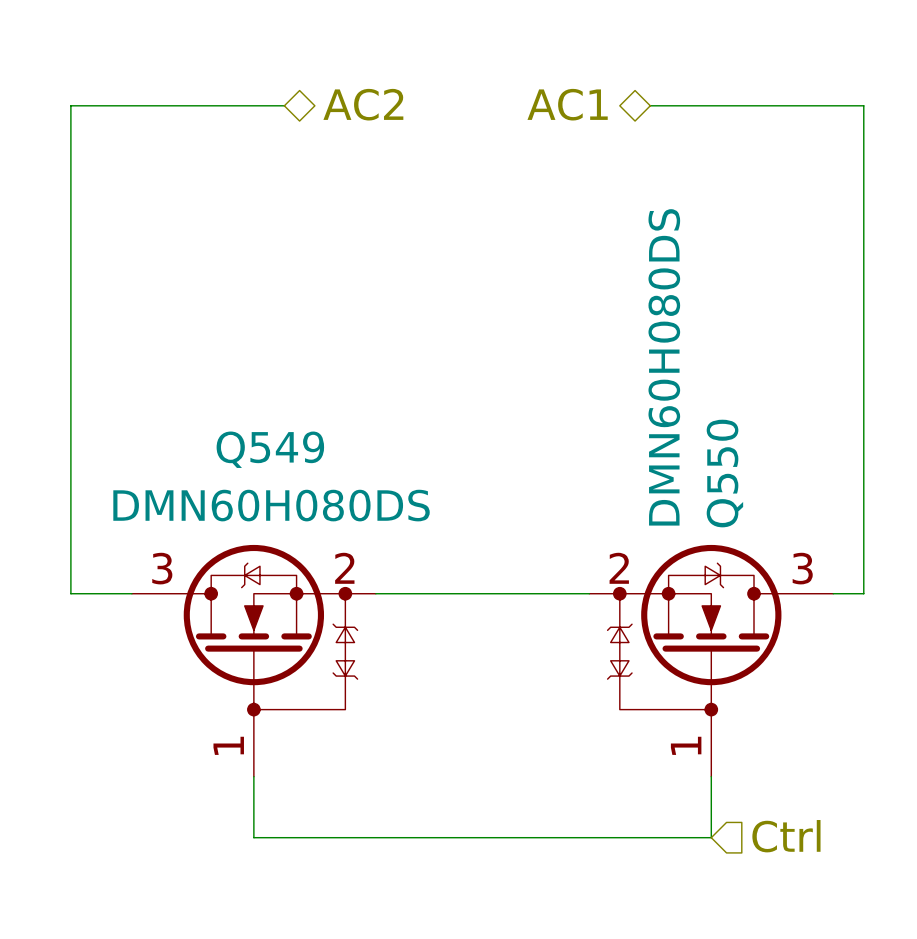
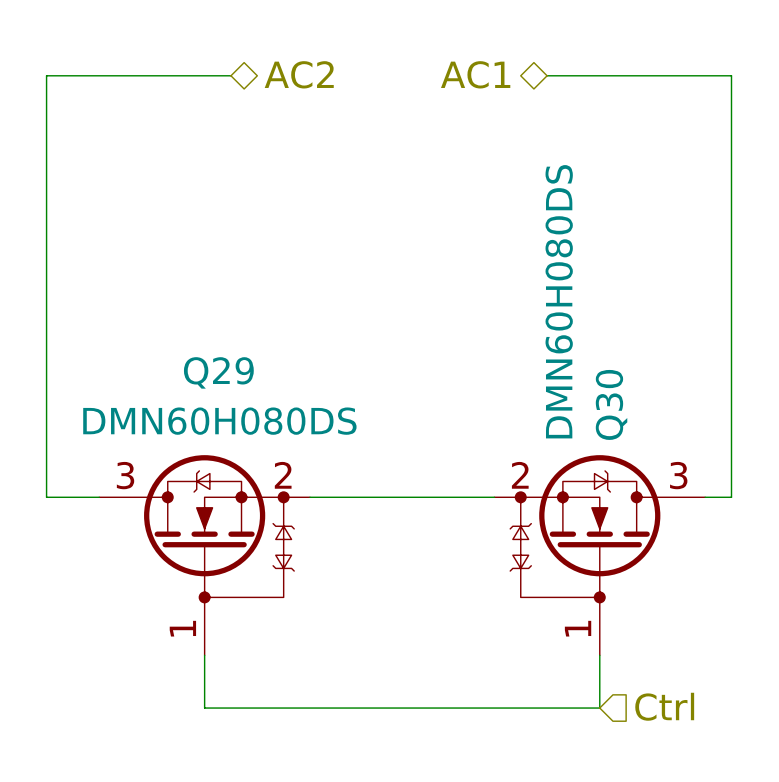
Q549 name: Q549 (270, 449) -> Q29 (218, 372)
Q550 name: Q550 (724, 473) -> Q30 (611, 404)

